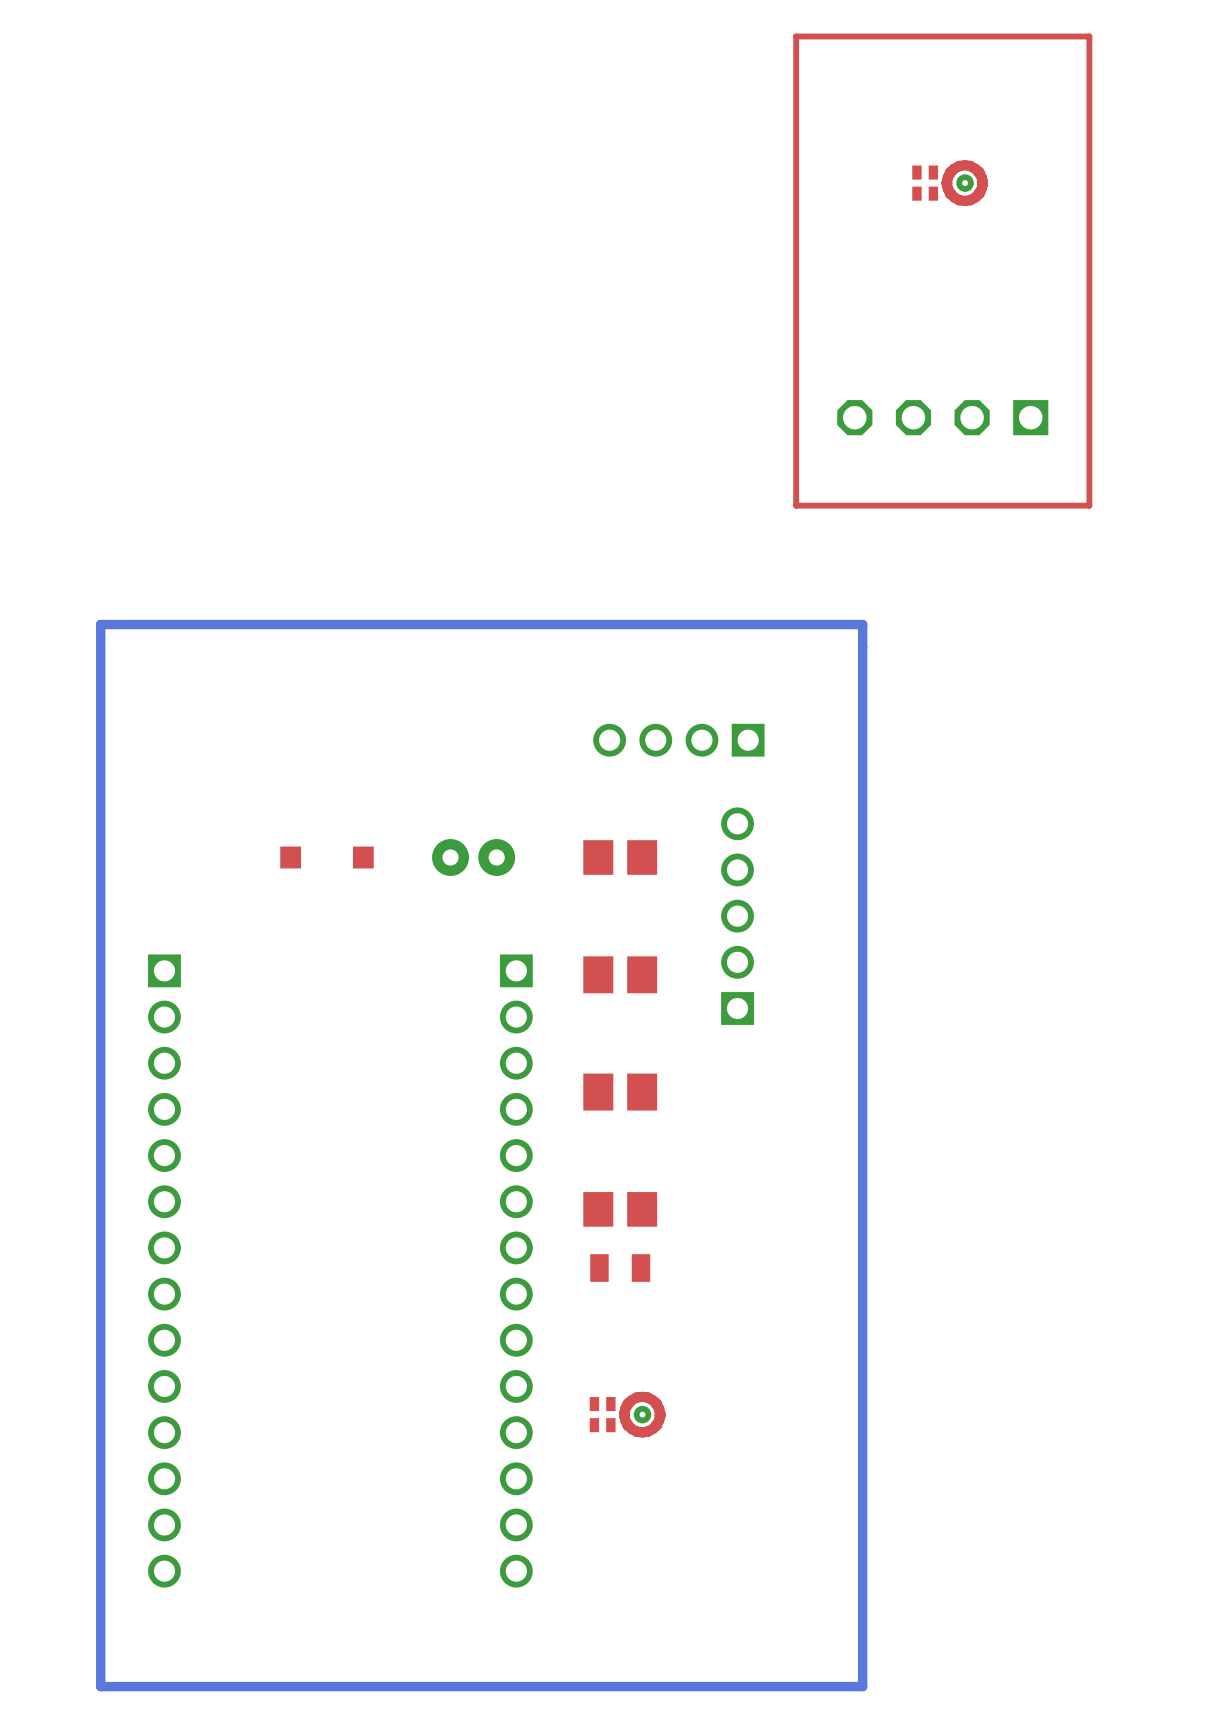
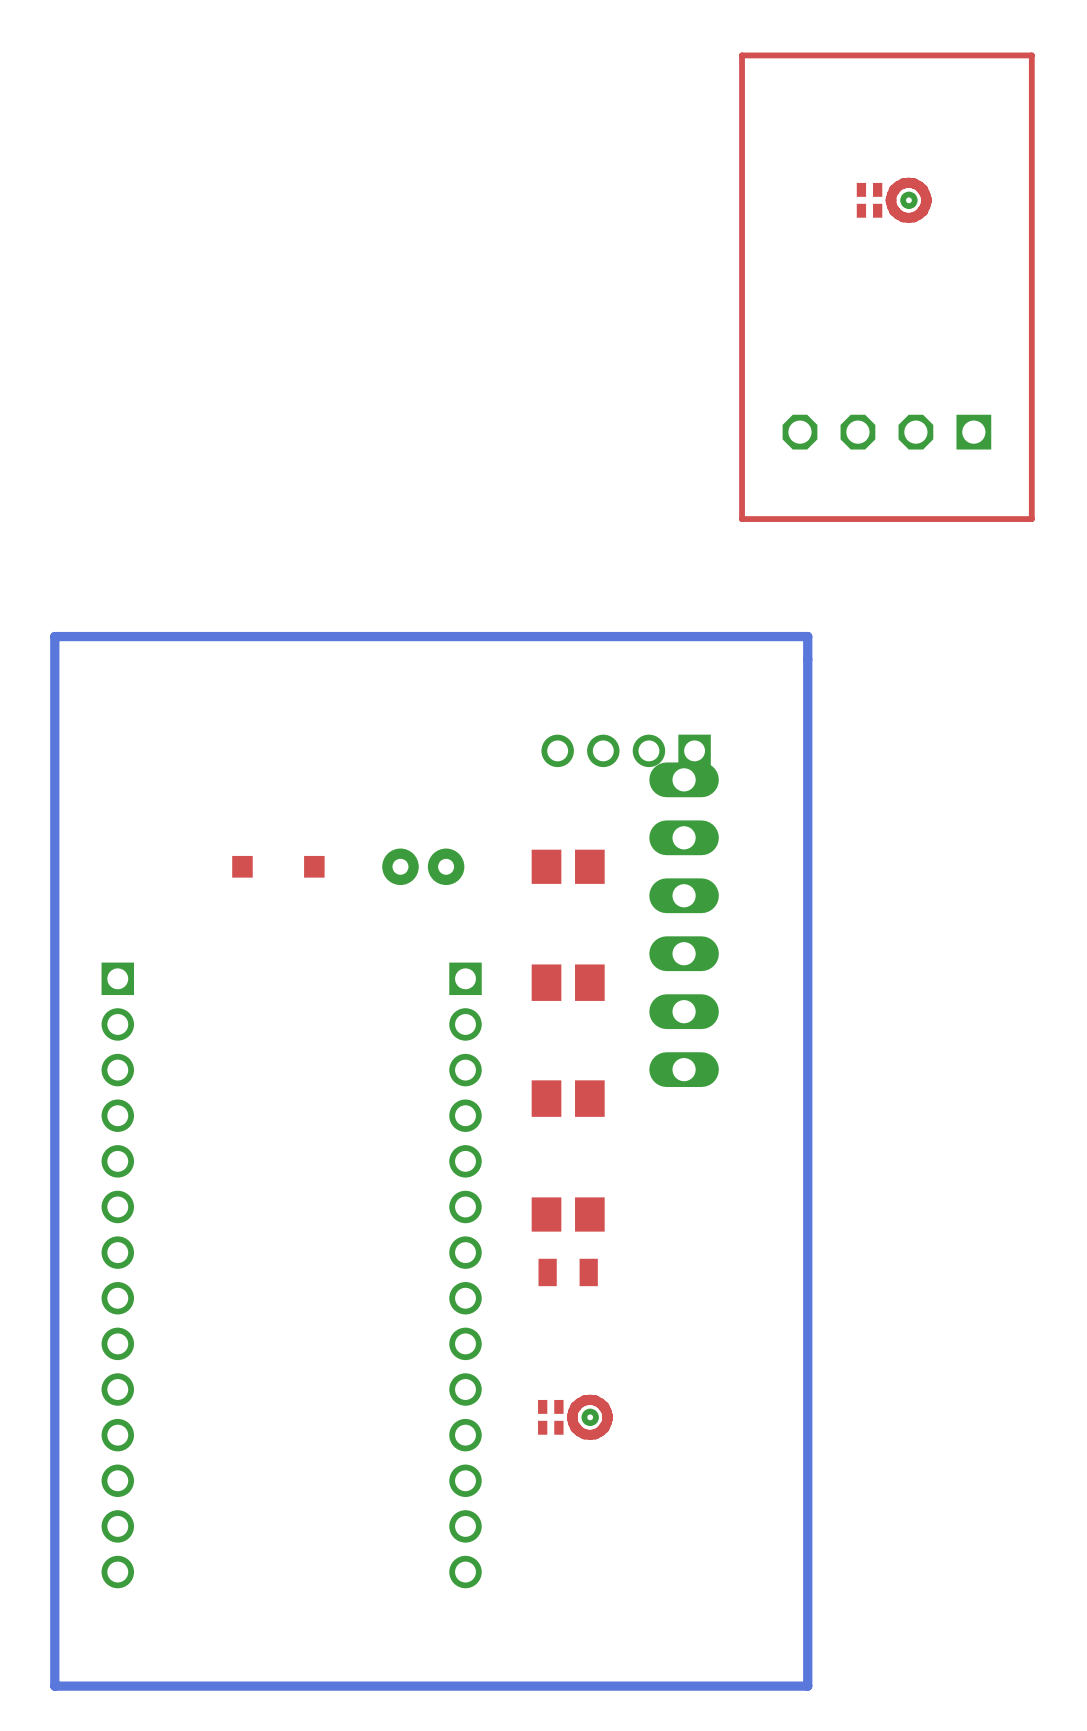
part footprint: [721, 807, 754, 1025] -> [649, 762, 719, 1088]

